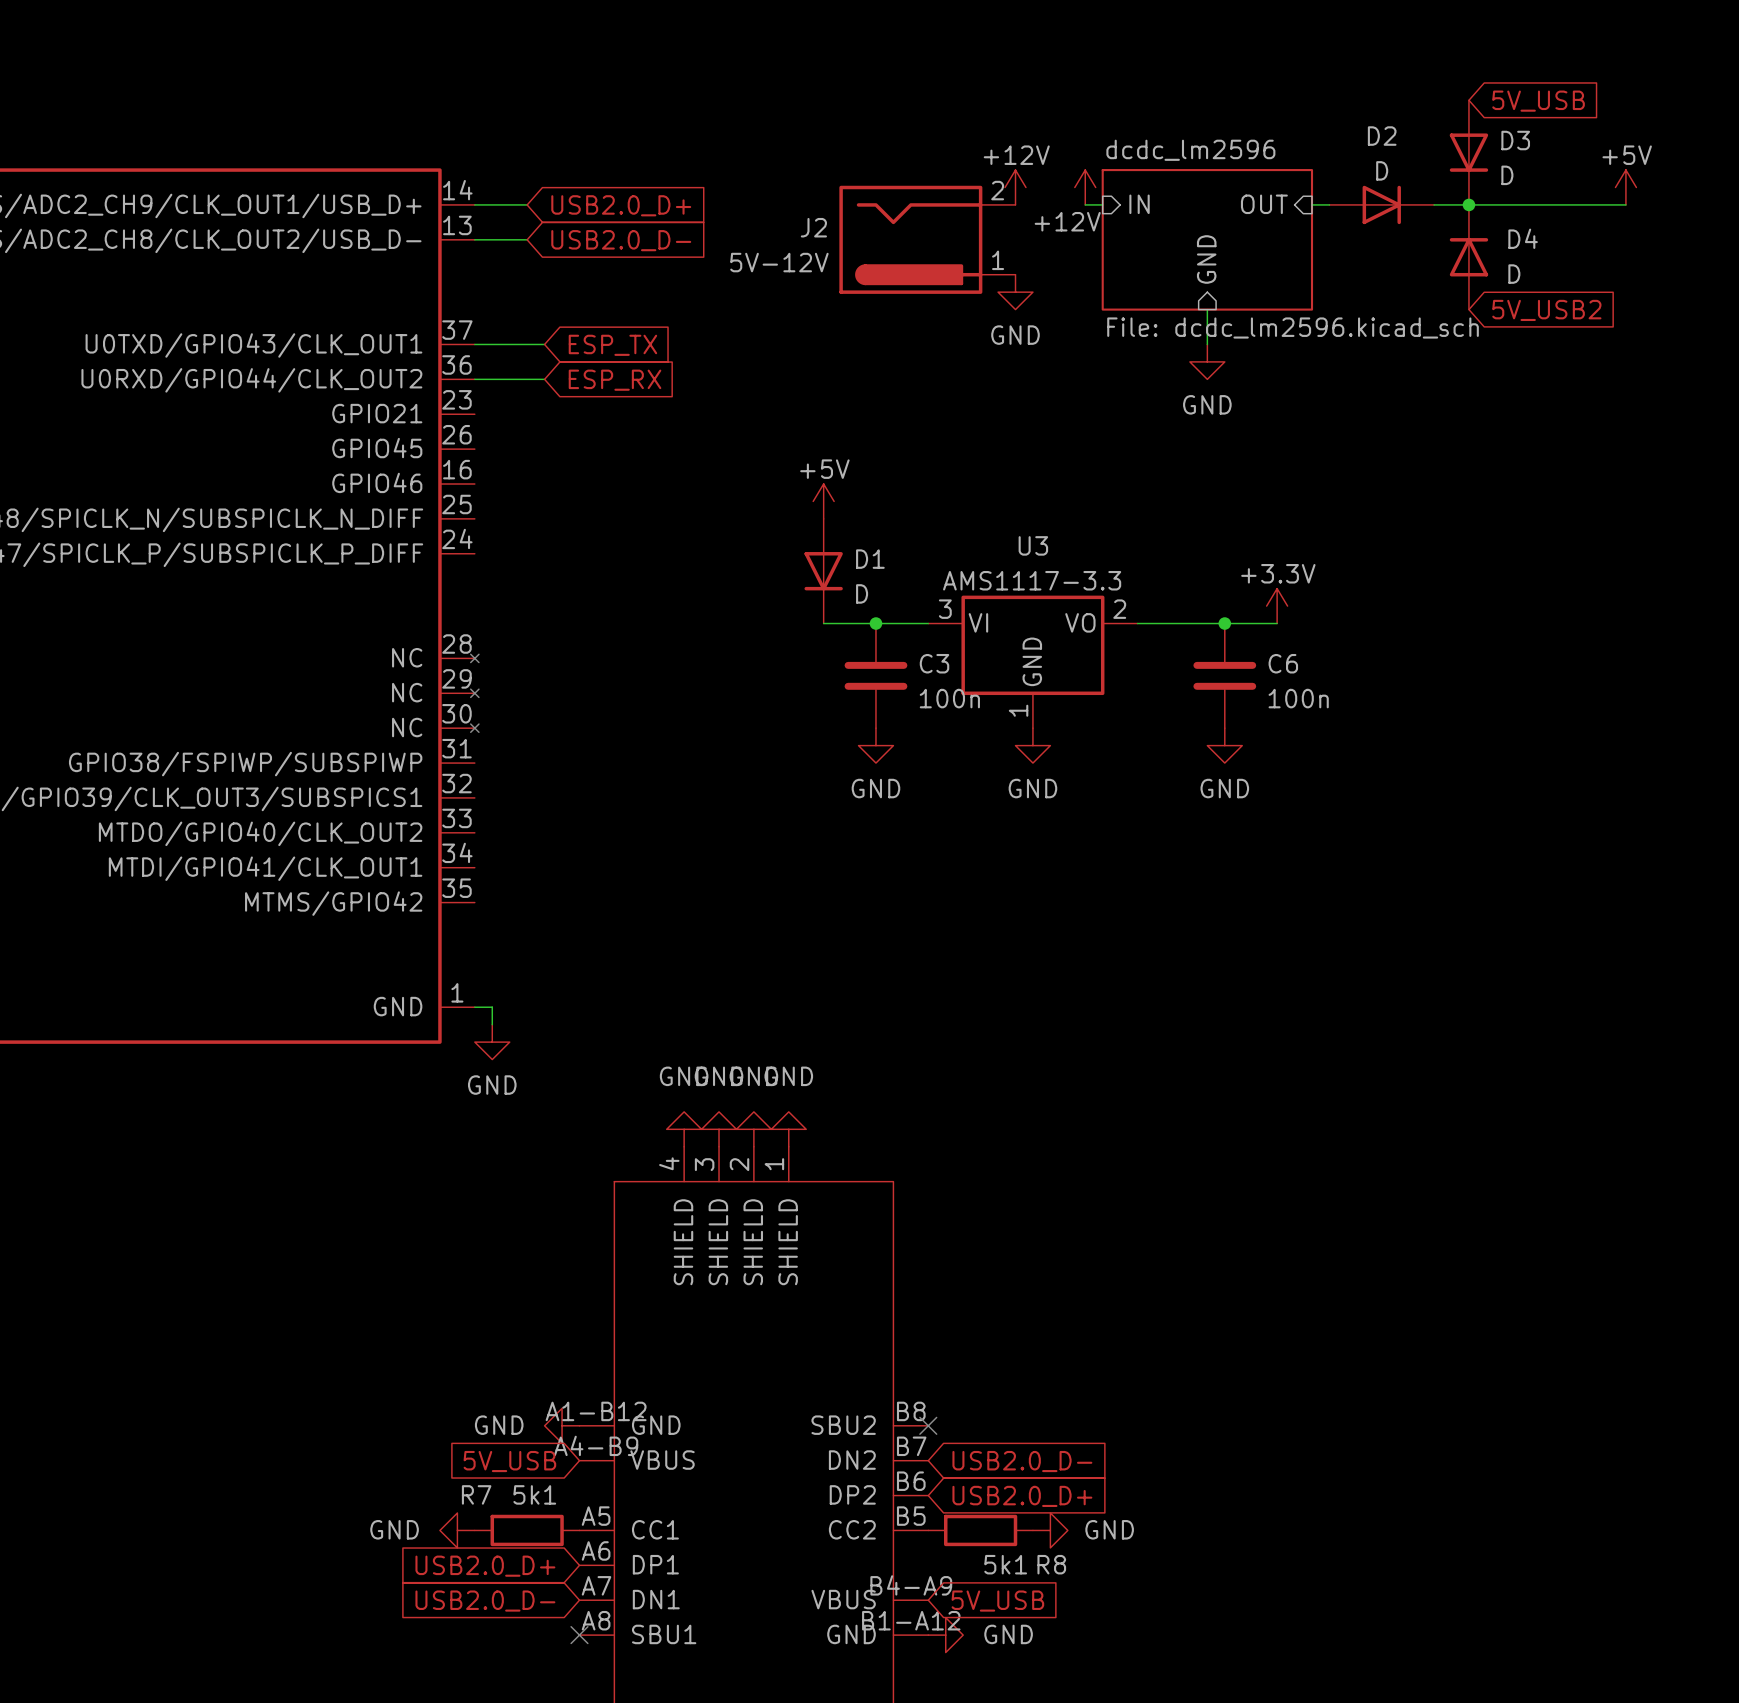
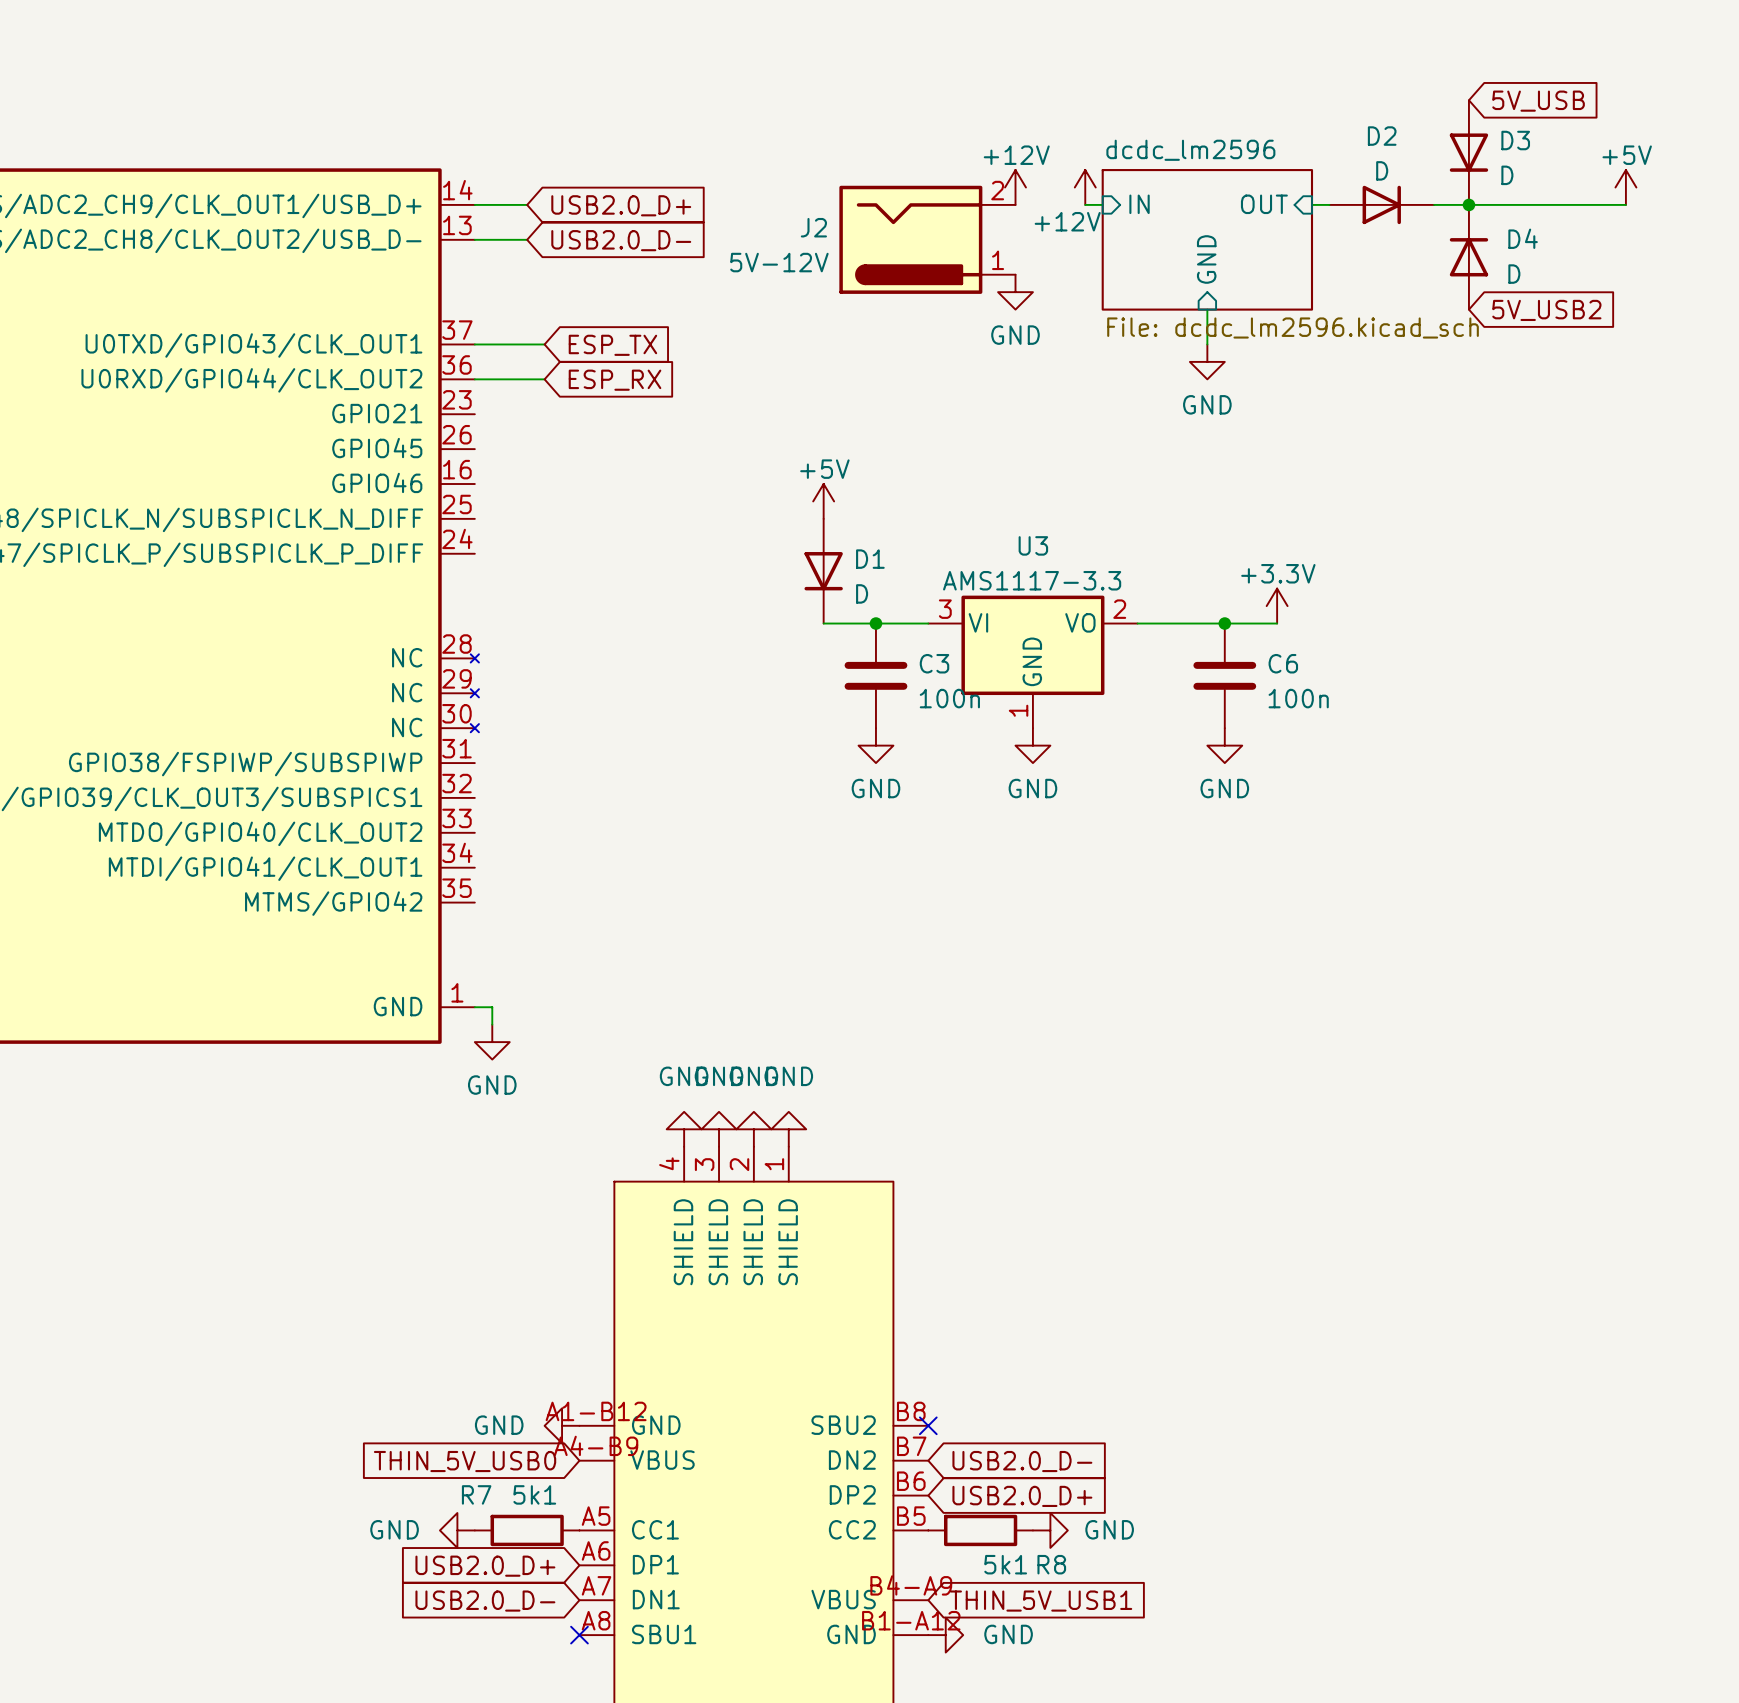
global label: 5V_USB (509, 1461) -> THIN_5V_USB0 (465, 1461)
global label: 5V_USB (997, 1601) -> THIN_5V_USB1 (1041, 1601)

